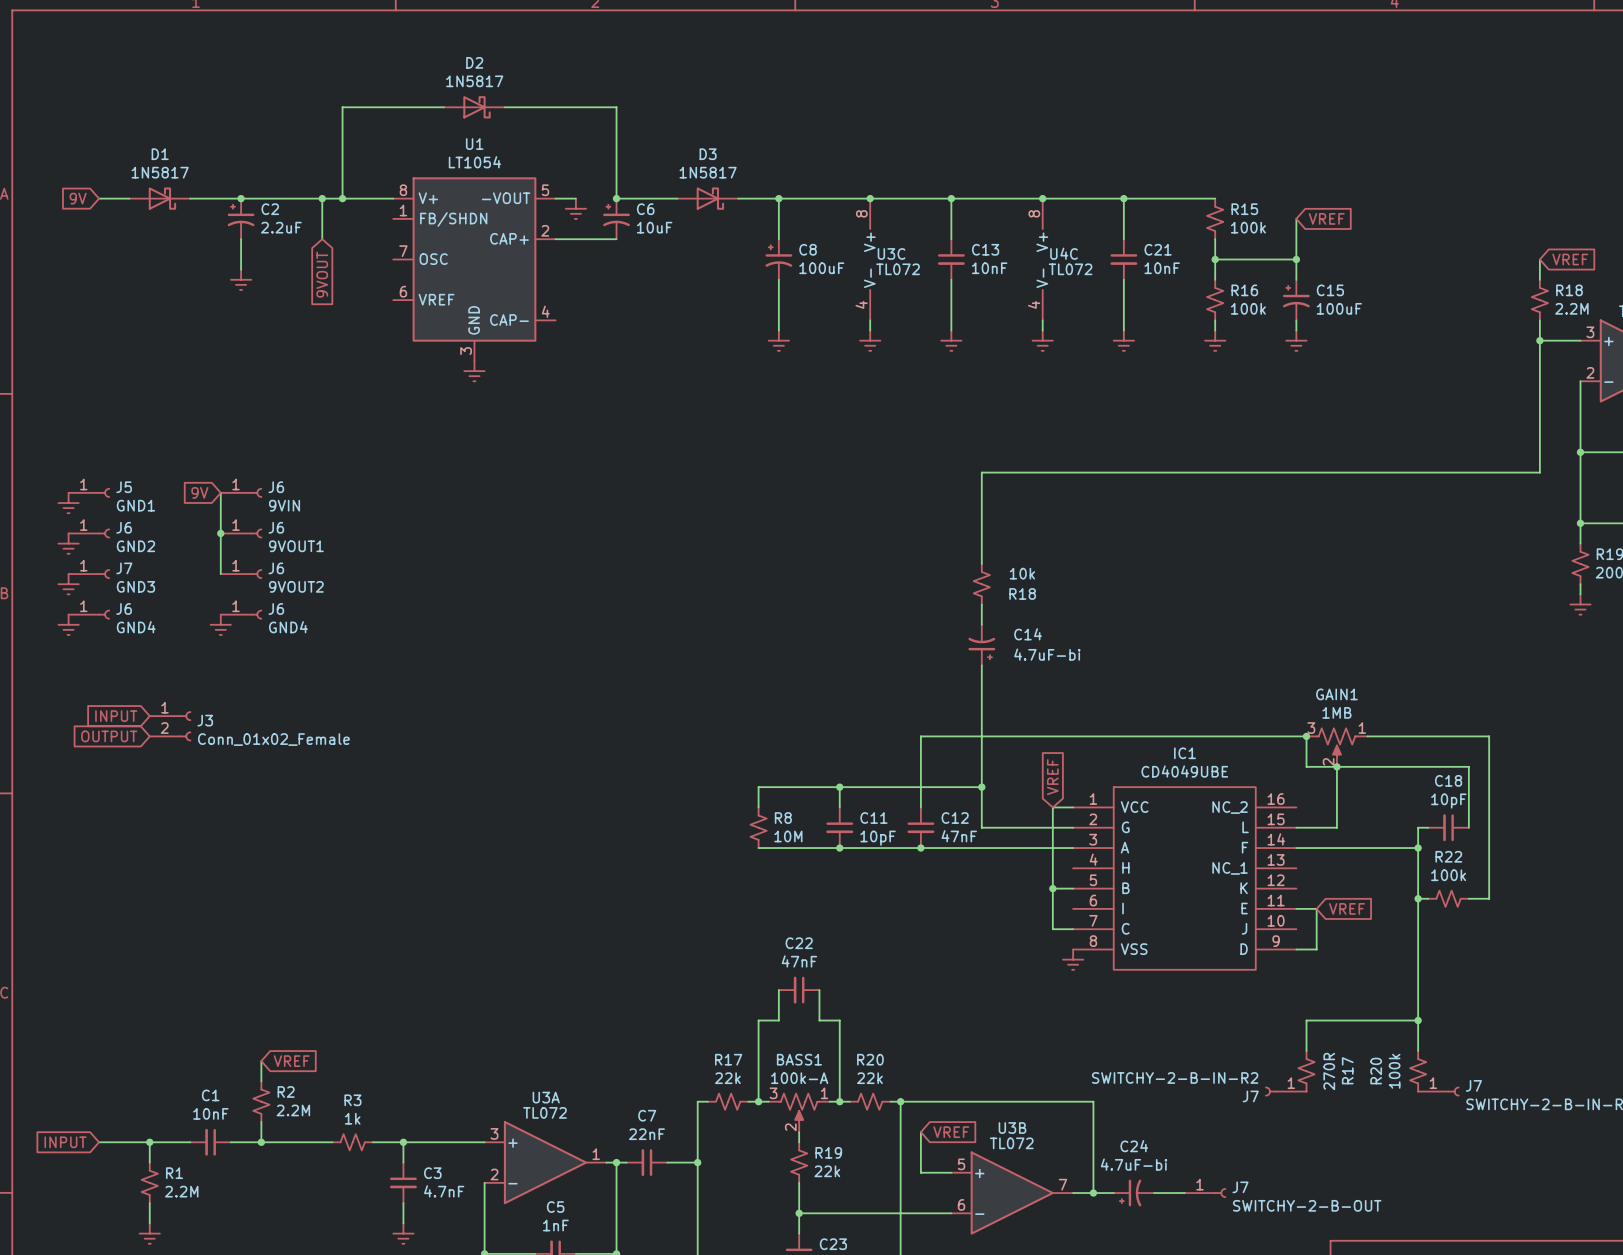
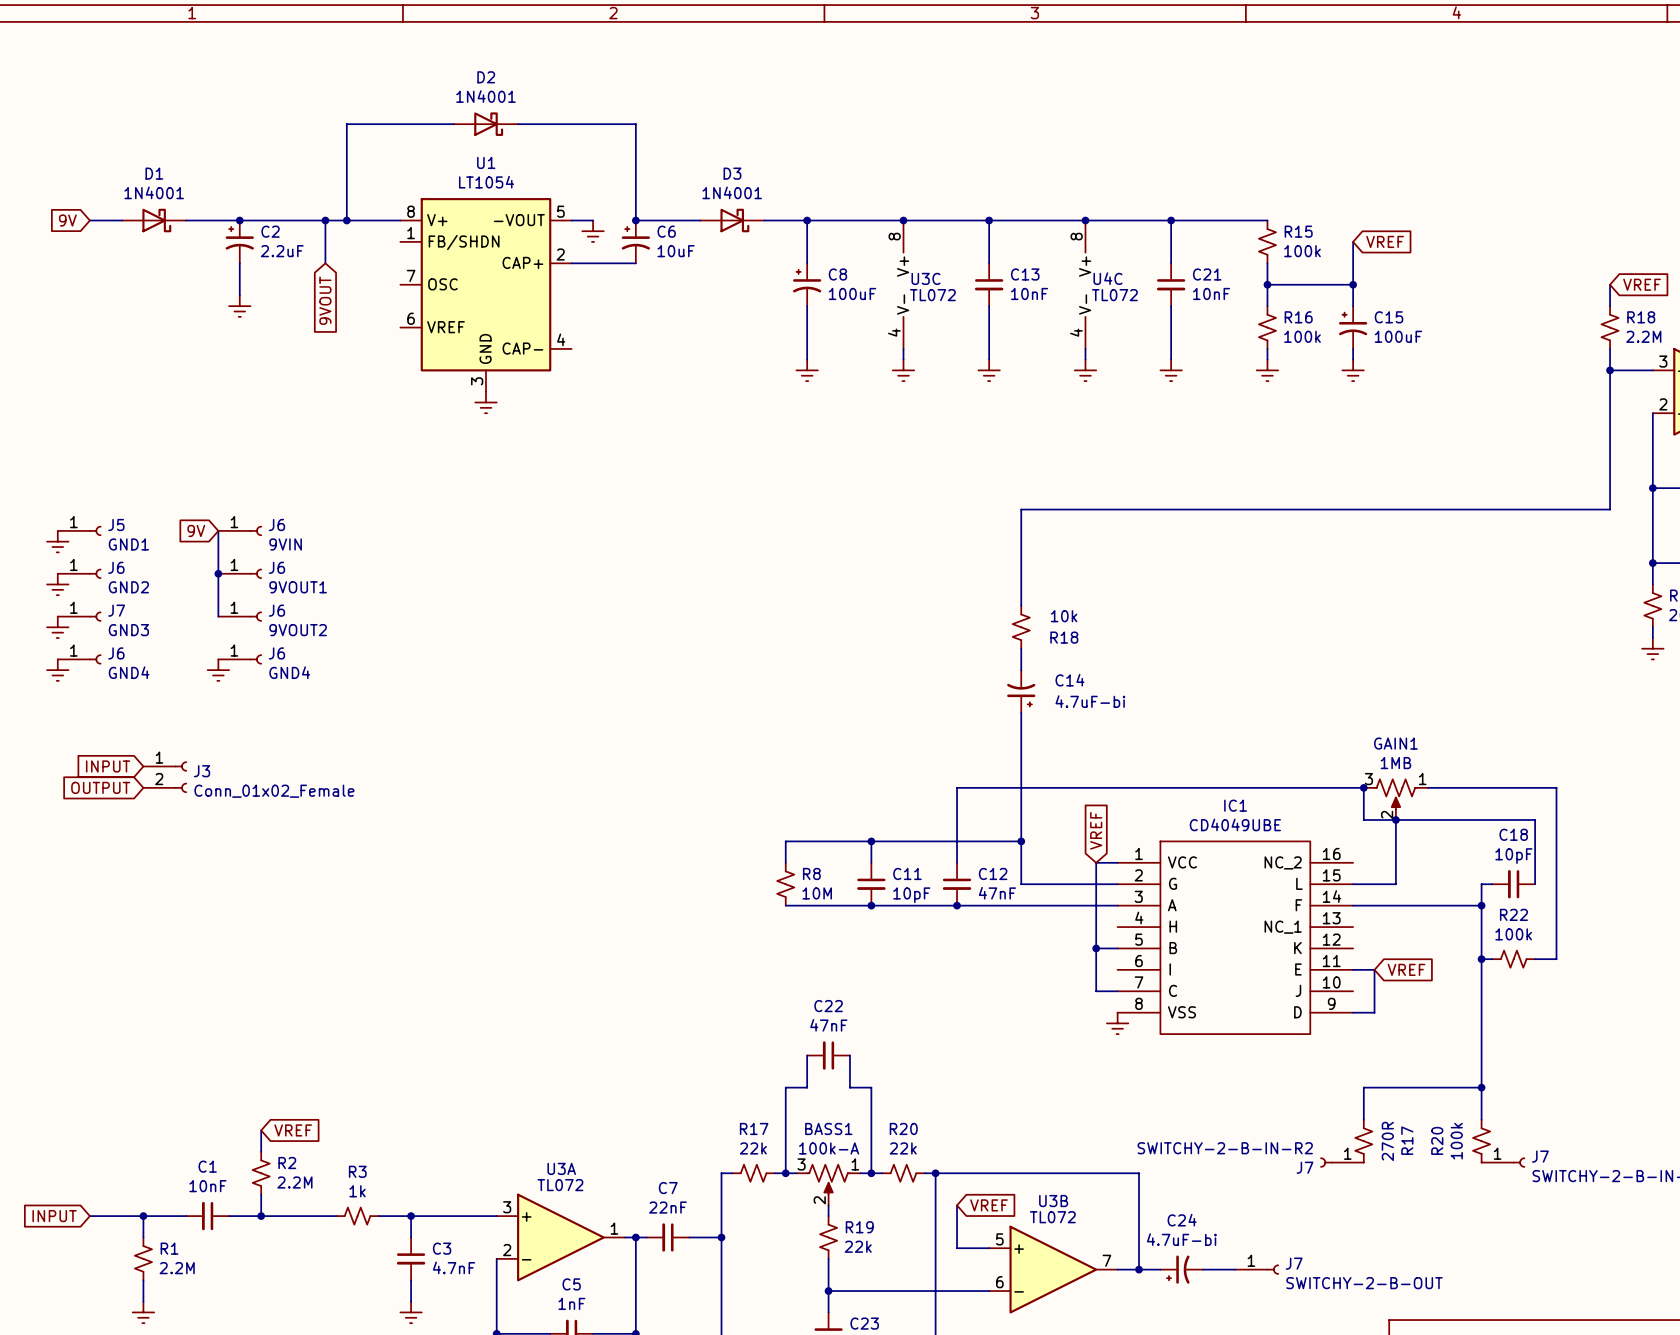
D2 value: 1N5817 (474, 81) -> 1N4001 (485, 96)
D1 value: 1N5817 (160, 172) -> 1N4001 (154, 192)
D3 value: 1N5817 (708, 172) -> 1N4001 (732, 192)

